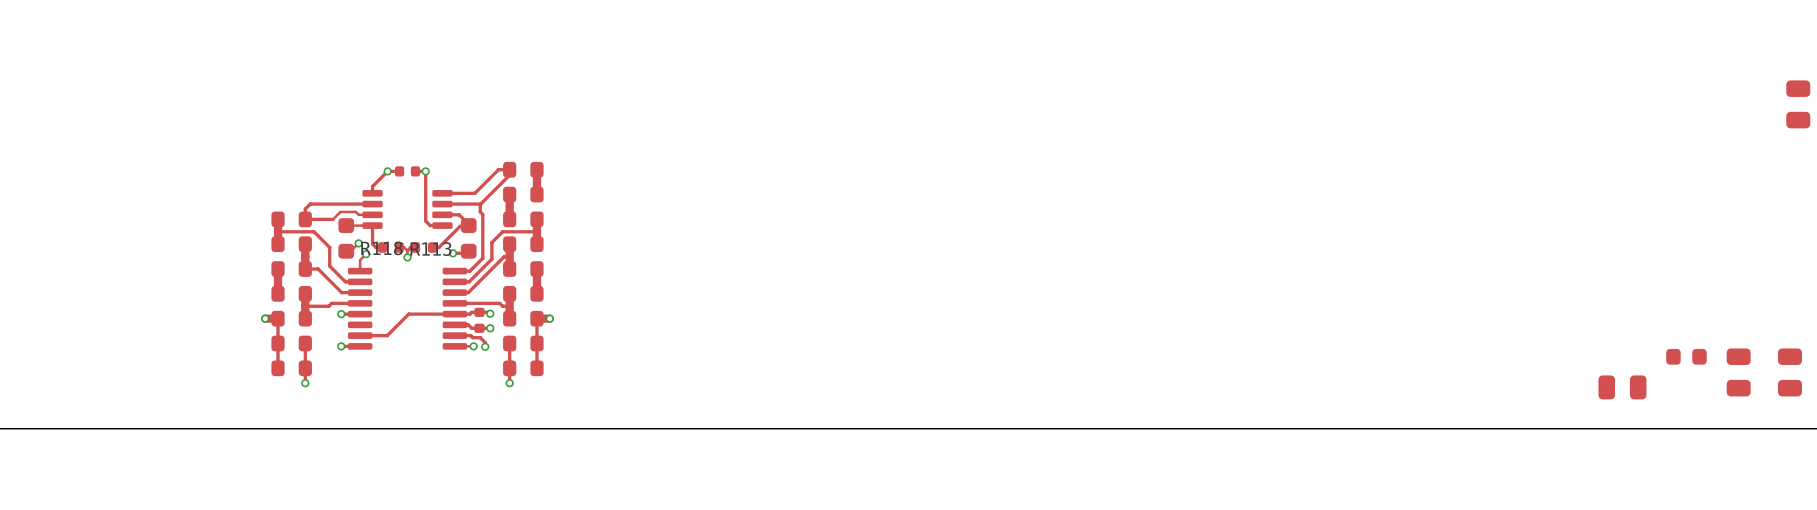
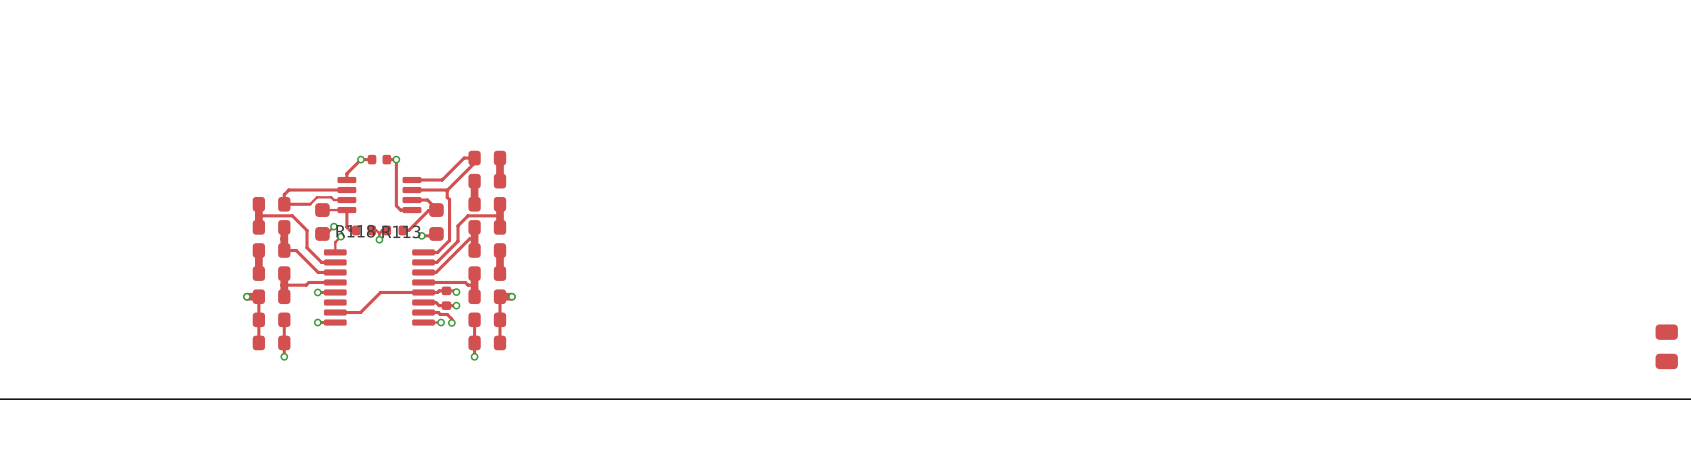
part: (1798, 104) -> none
part: (1686, 356) -> none
part: (1738, 372) -> none
part: (1622, 387) -> none

